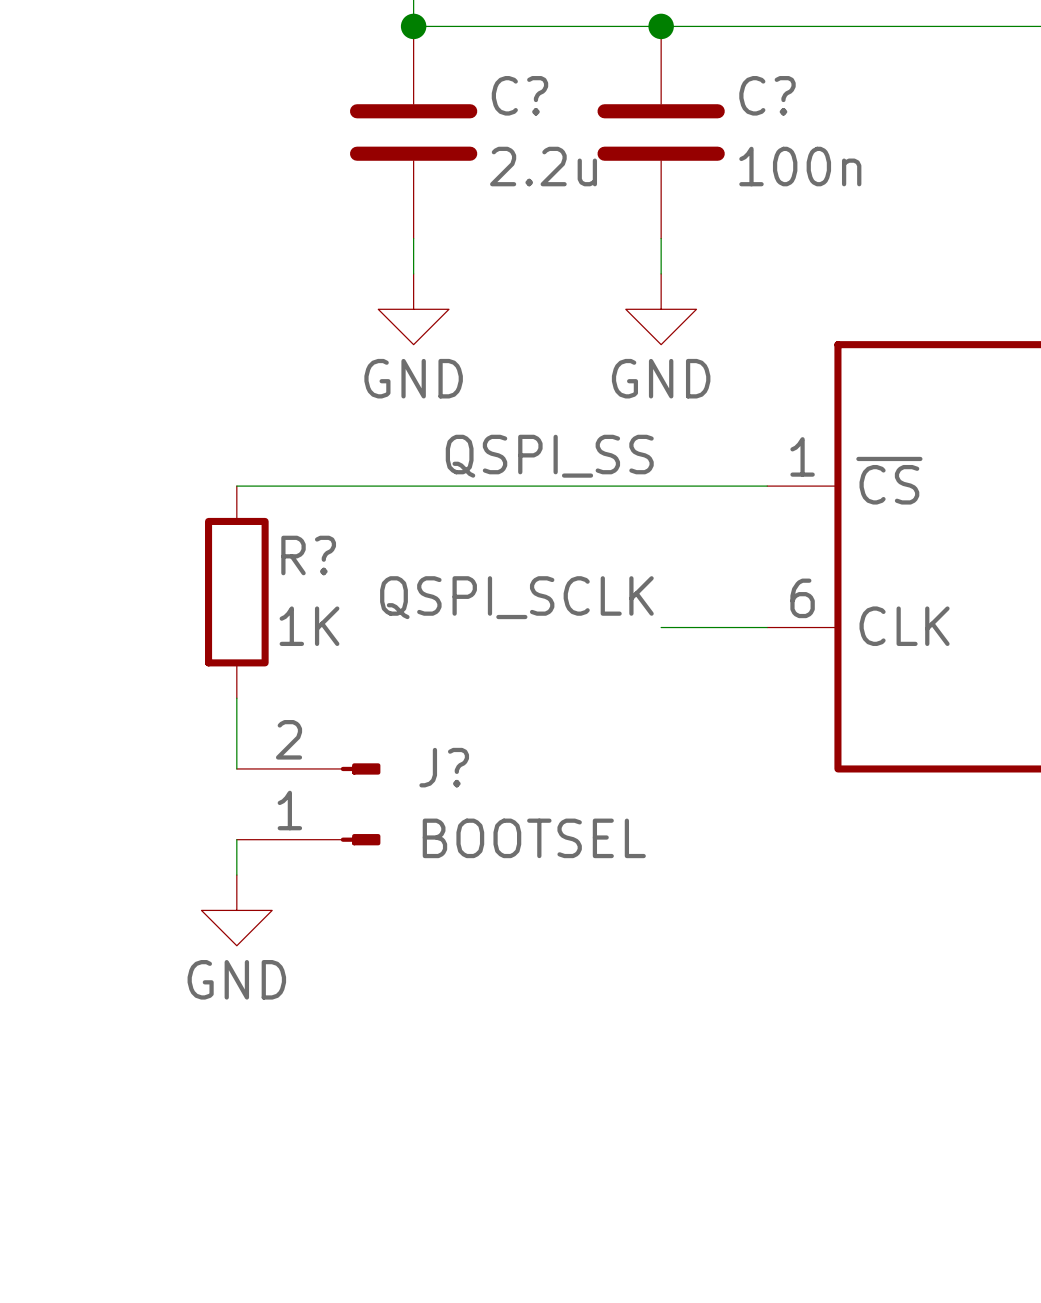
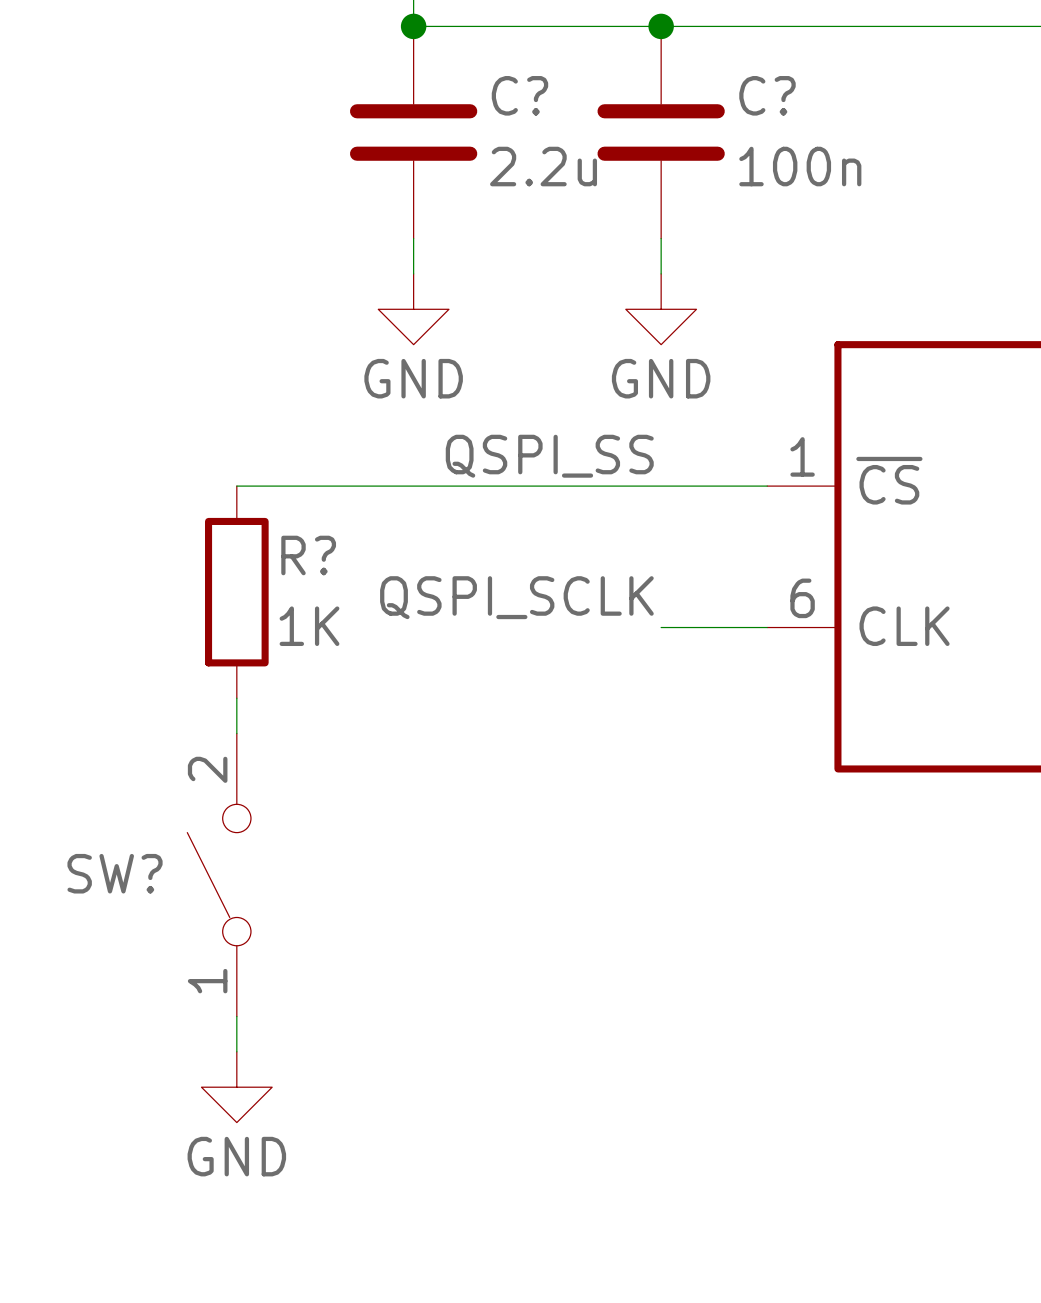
J?: BOOTSEL (308, 804) -> none
wire: (236, 839) (236, 875) -> (236, 1016) (236, 1051)
SW?: none -> (219, 875)
power symbol position: GND (236, 910) -> GND (236, 1087)

